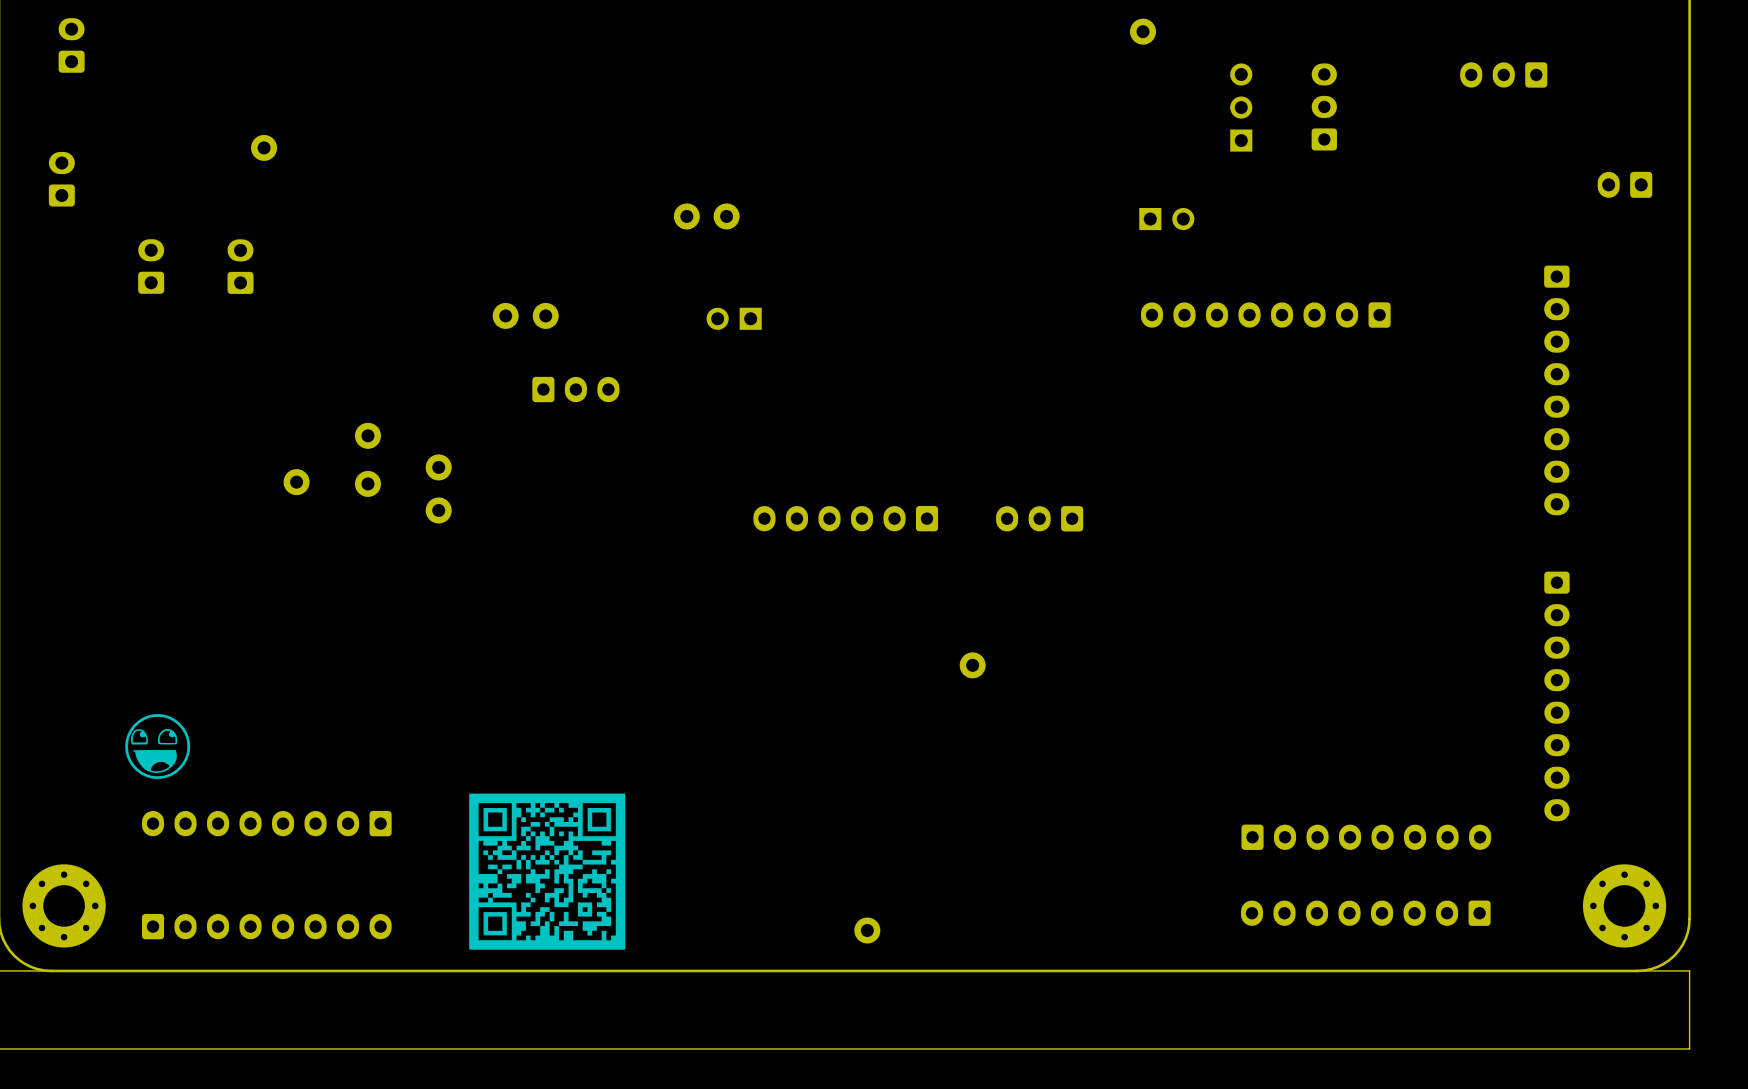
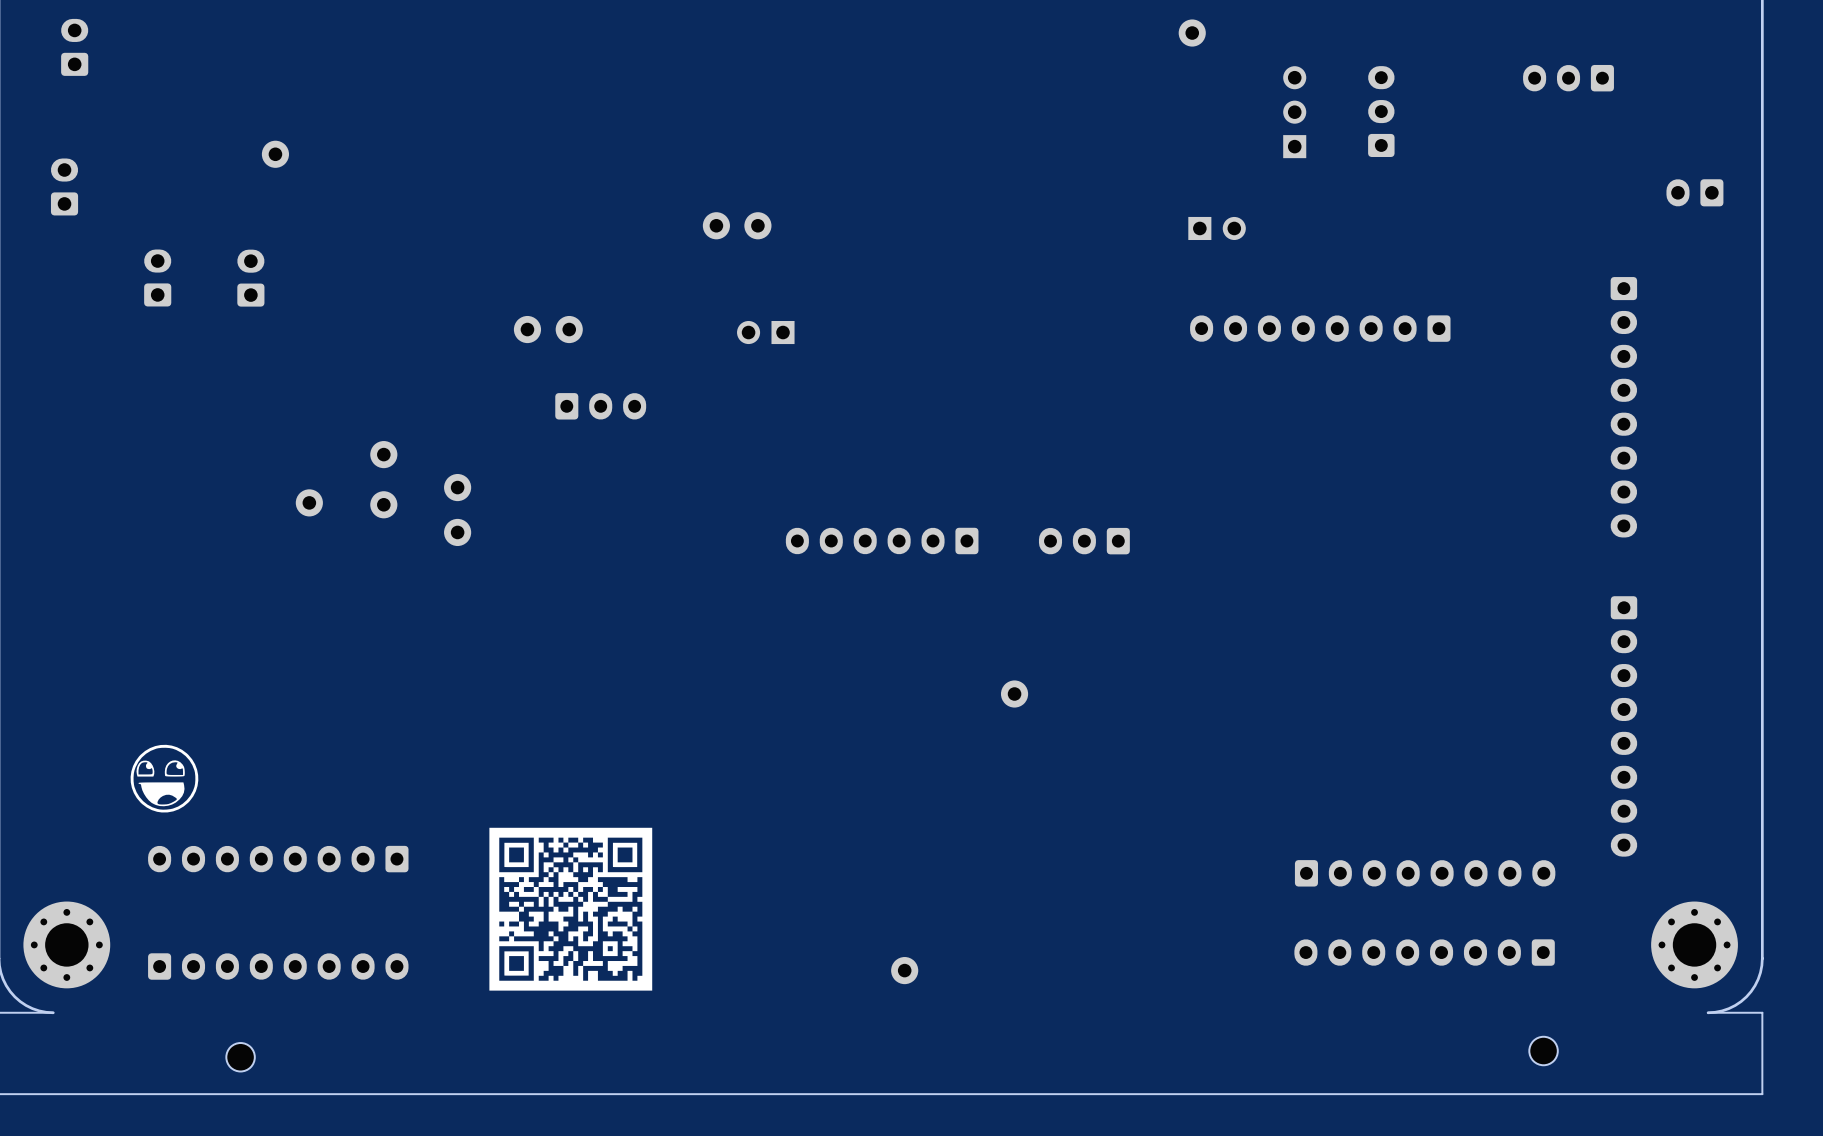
board edge: (1637, 970) (51, 970) (1637, 970) -> none
part: none -> (1543, 1051)
part: none -> (240, 1057)

